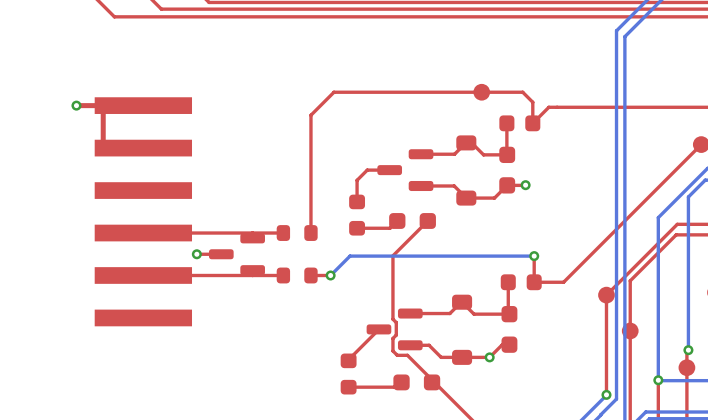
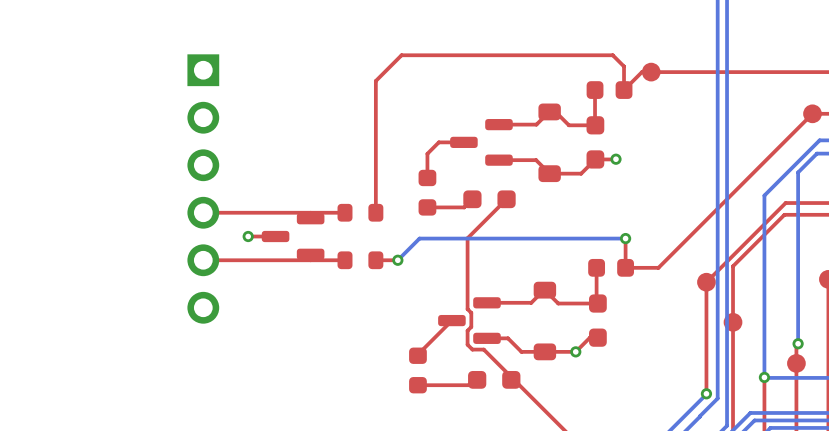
part position: (481, 92) -> (651, 72)
part footprint: [94, 97, 193, 327] -> [187, 54, 220, 324]
top track: (76, 105) (103, 105) (103, 148) -> none
via: (76, 105) -> none

